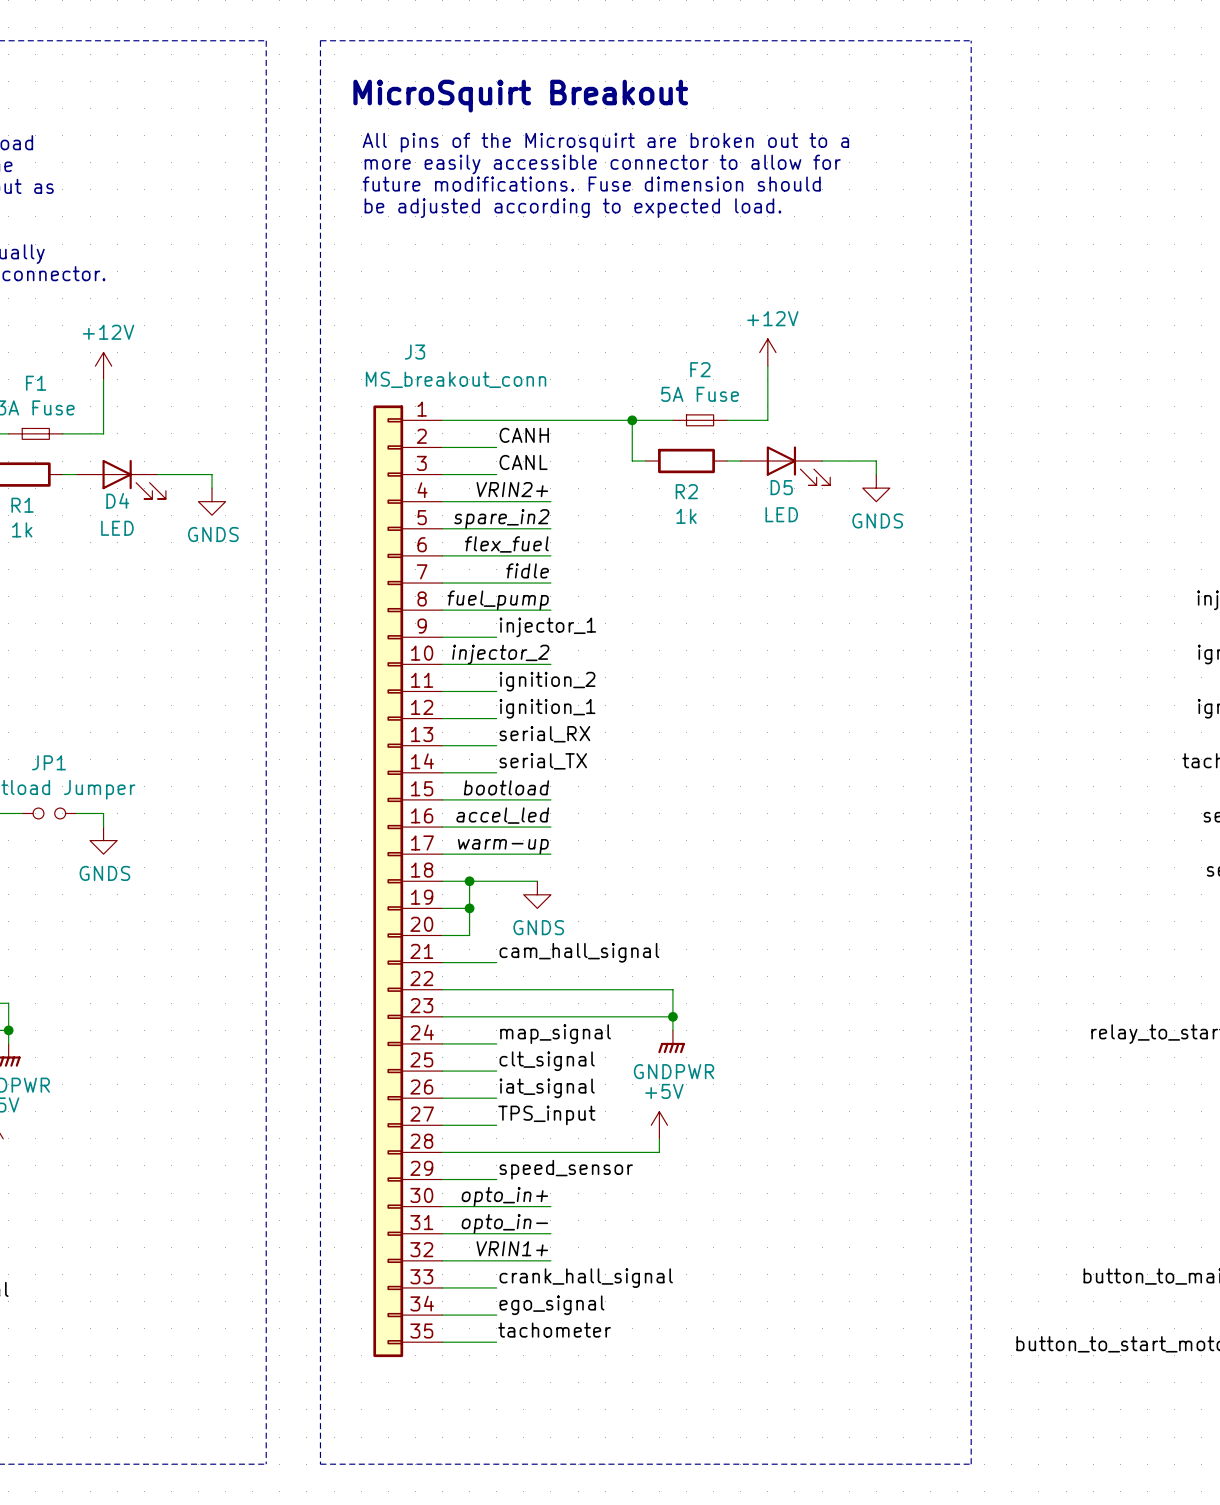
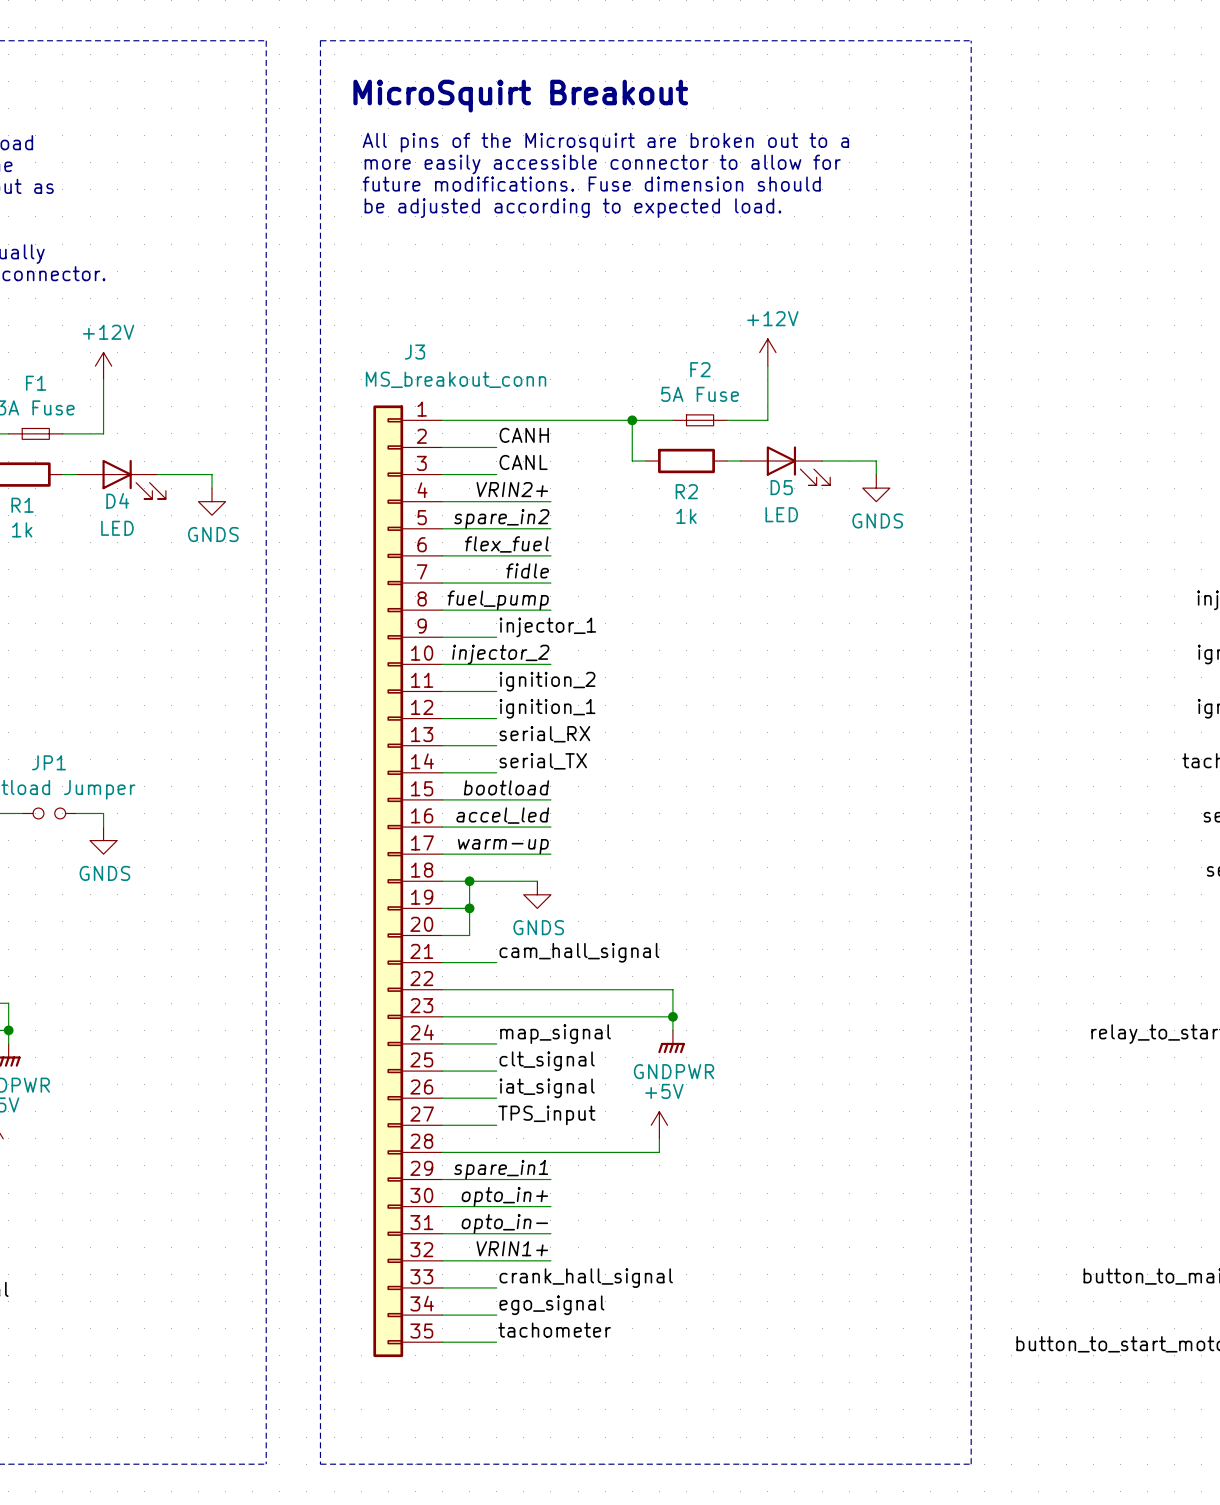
label: none -> spare_in1 (501, 1169)
label: speed_sensor (566, 1169) -> none
wire: none -> (496, 1179) (550, 1179)

